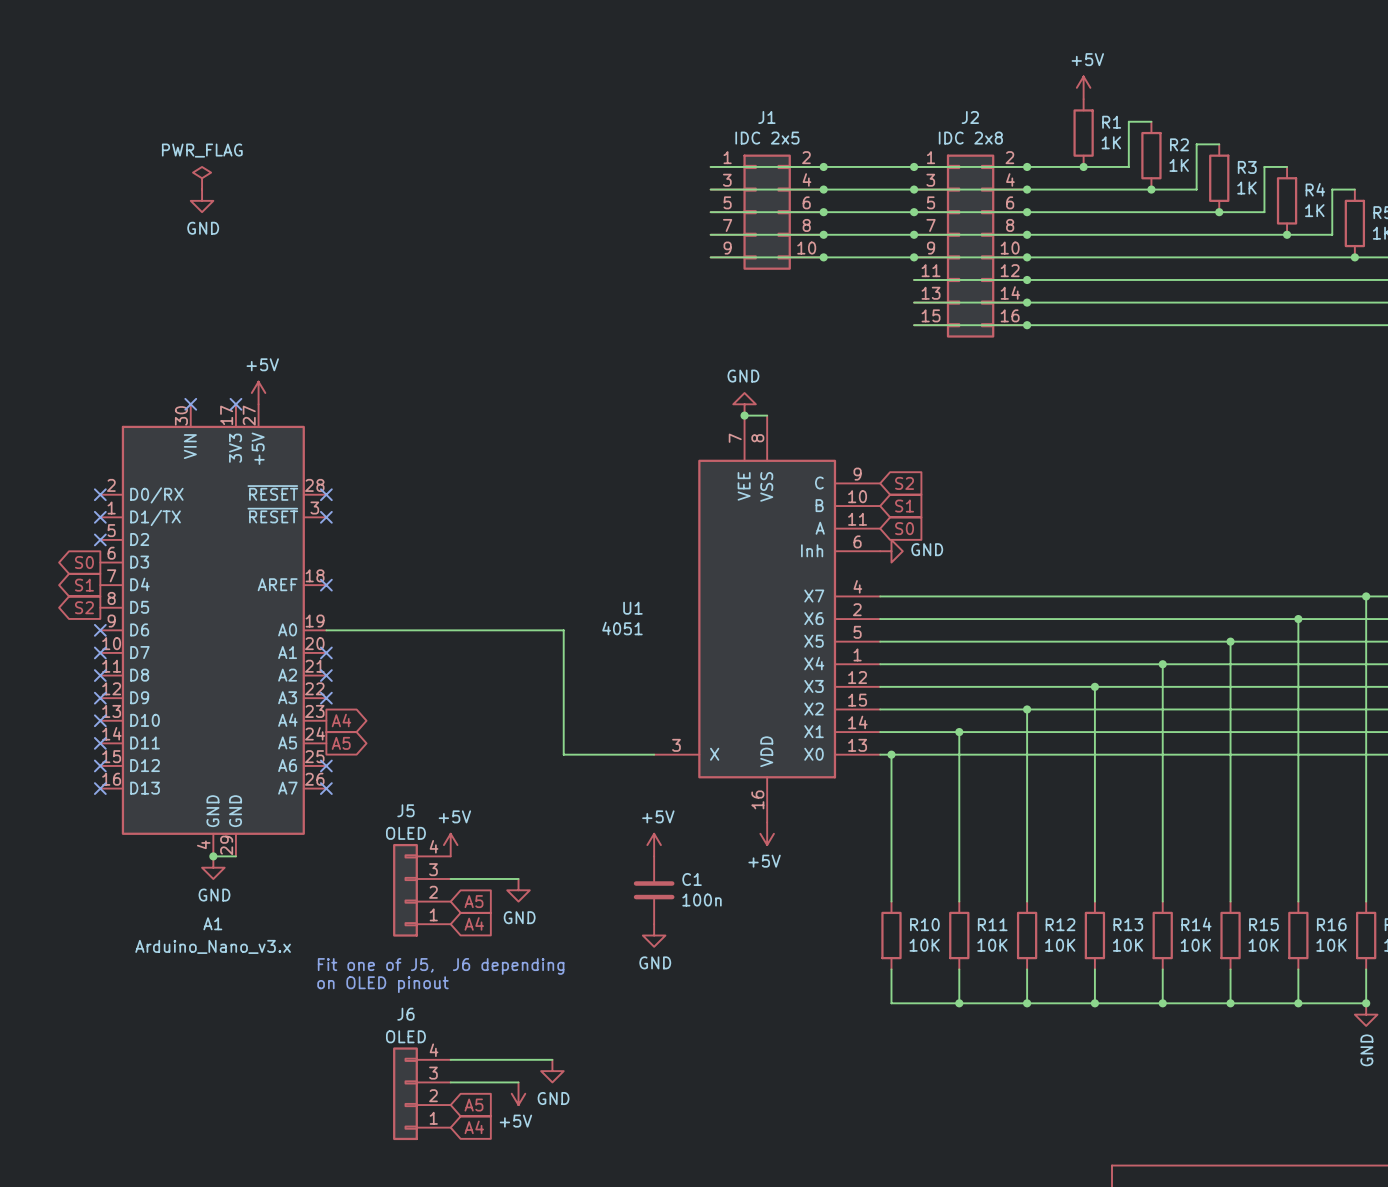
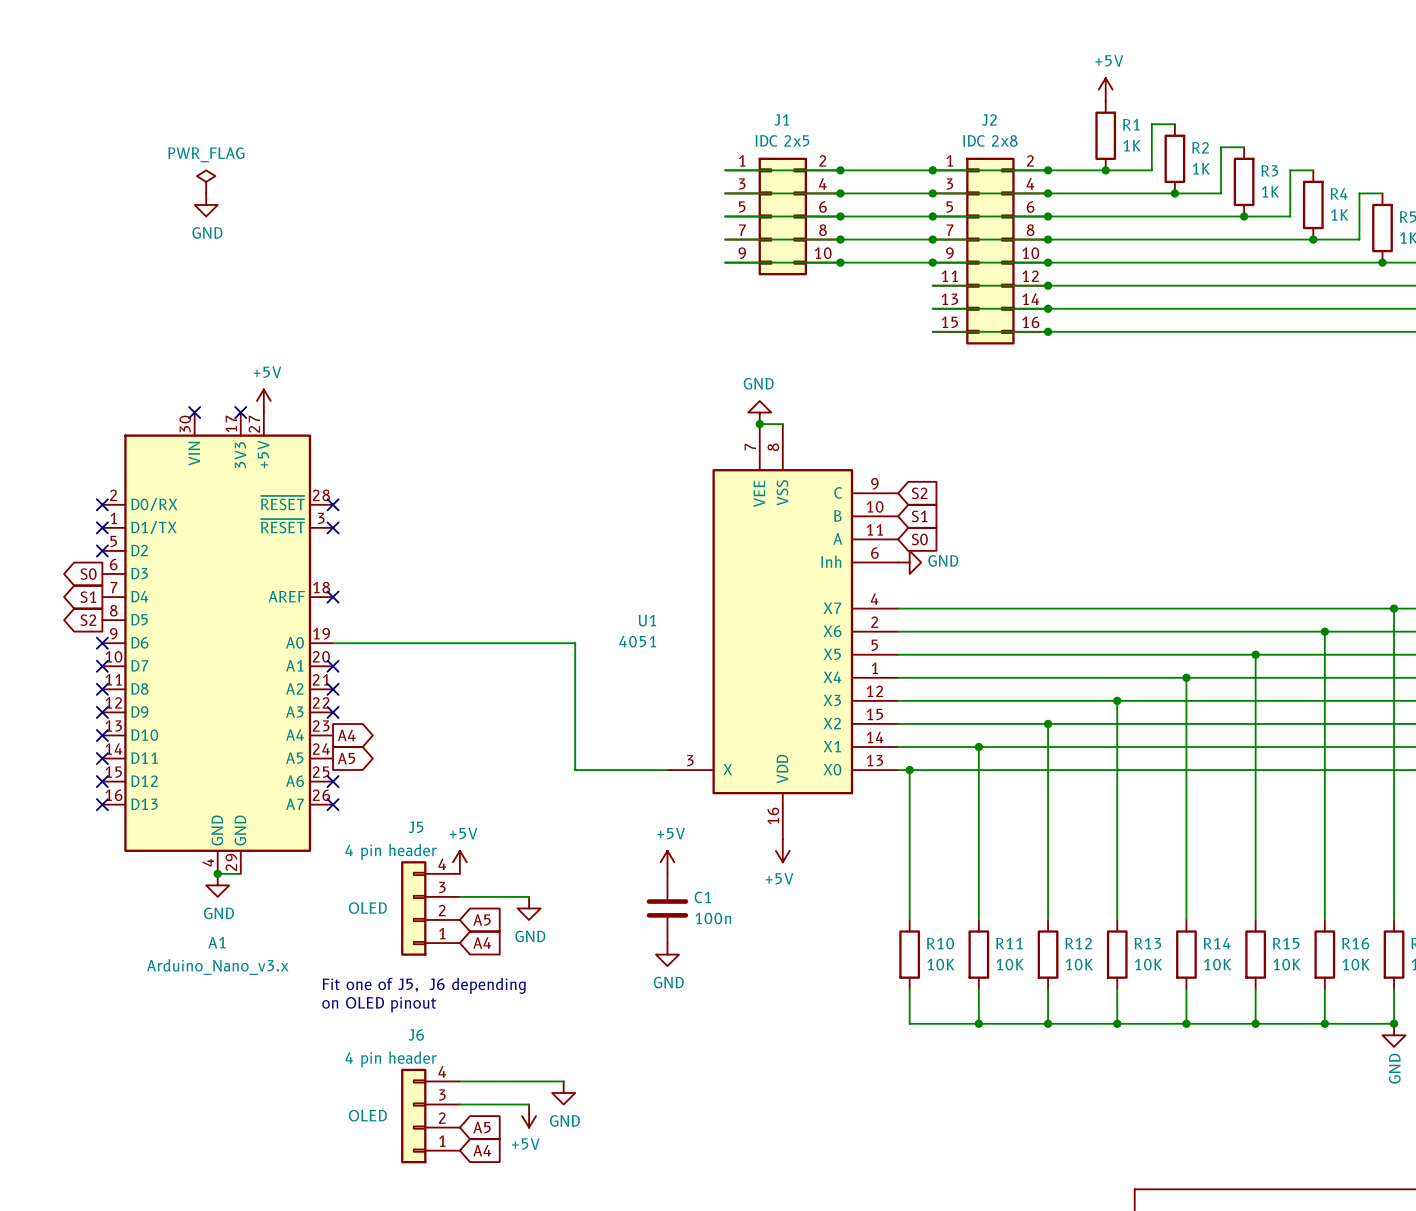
J5 value: OLED (405, 833) -> 4 pin header (391, 851)
J5 text: none -> OLED (367, 908)
J6 value: OLED (405, 1036) -> 4 pin header (391, 1059)
J6 text: none -> OLED (367, 1115)

